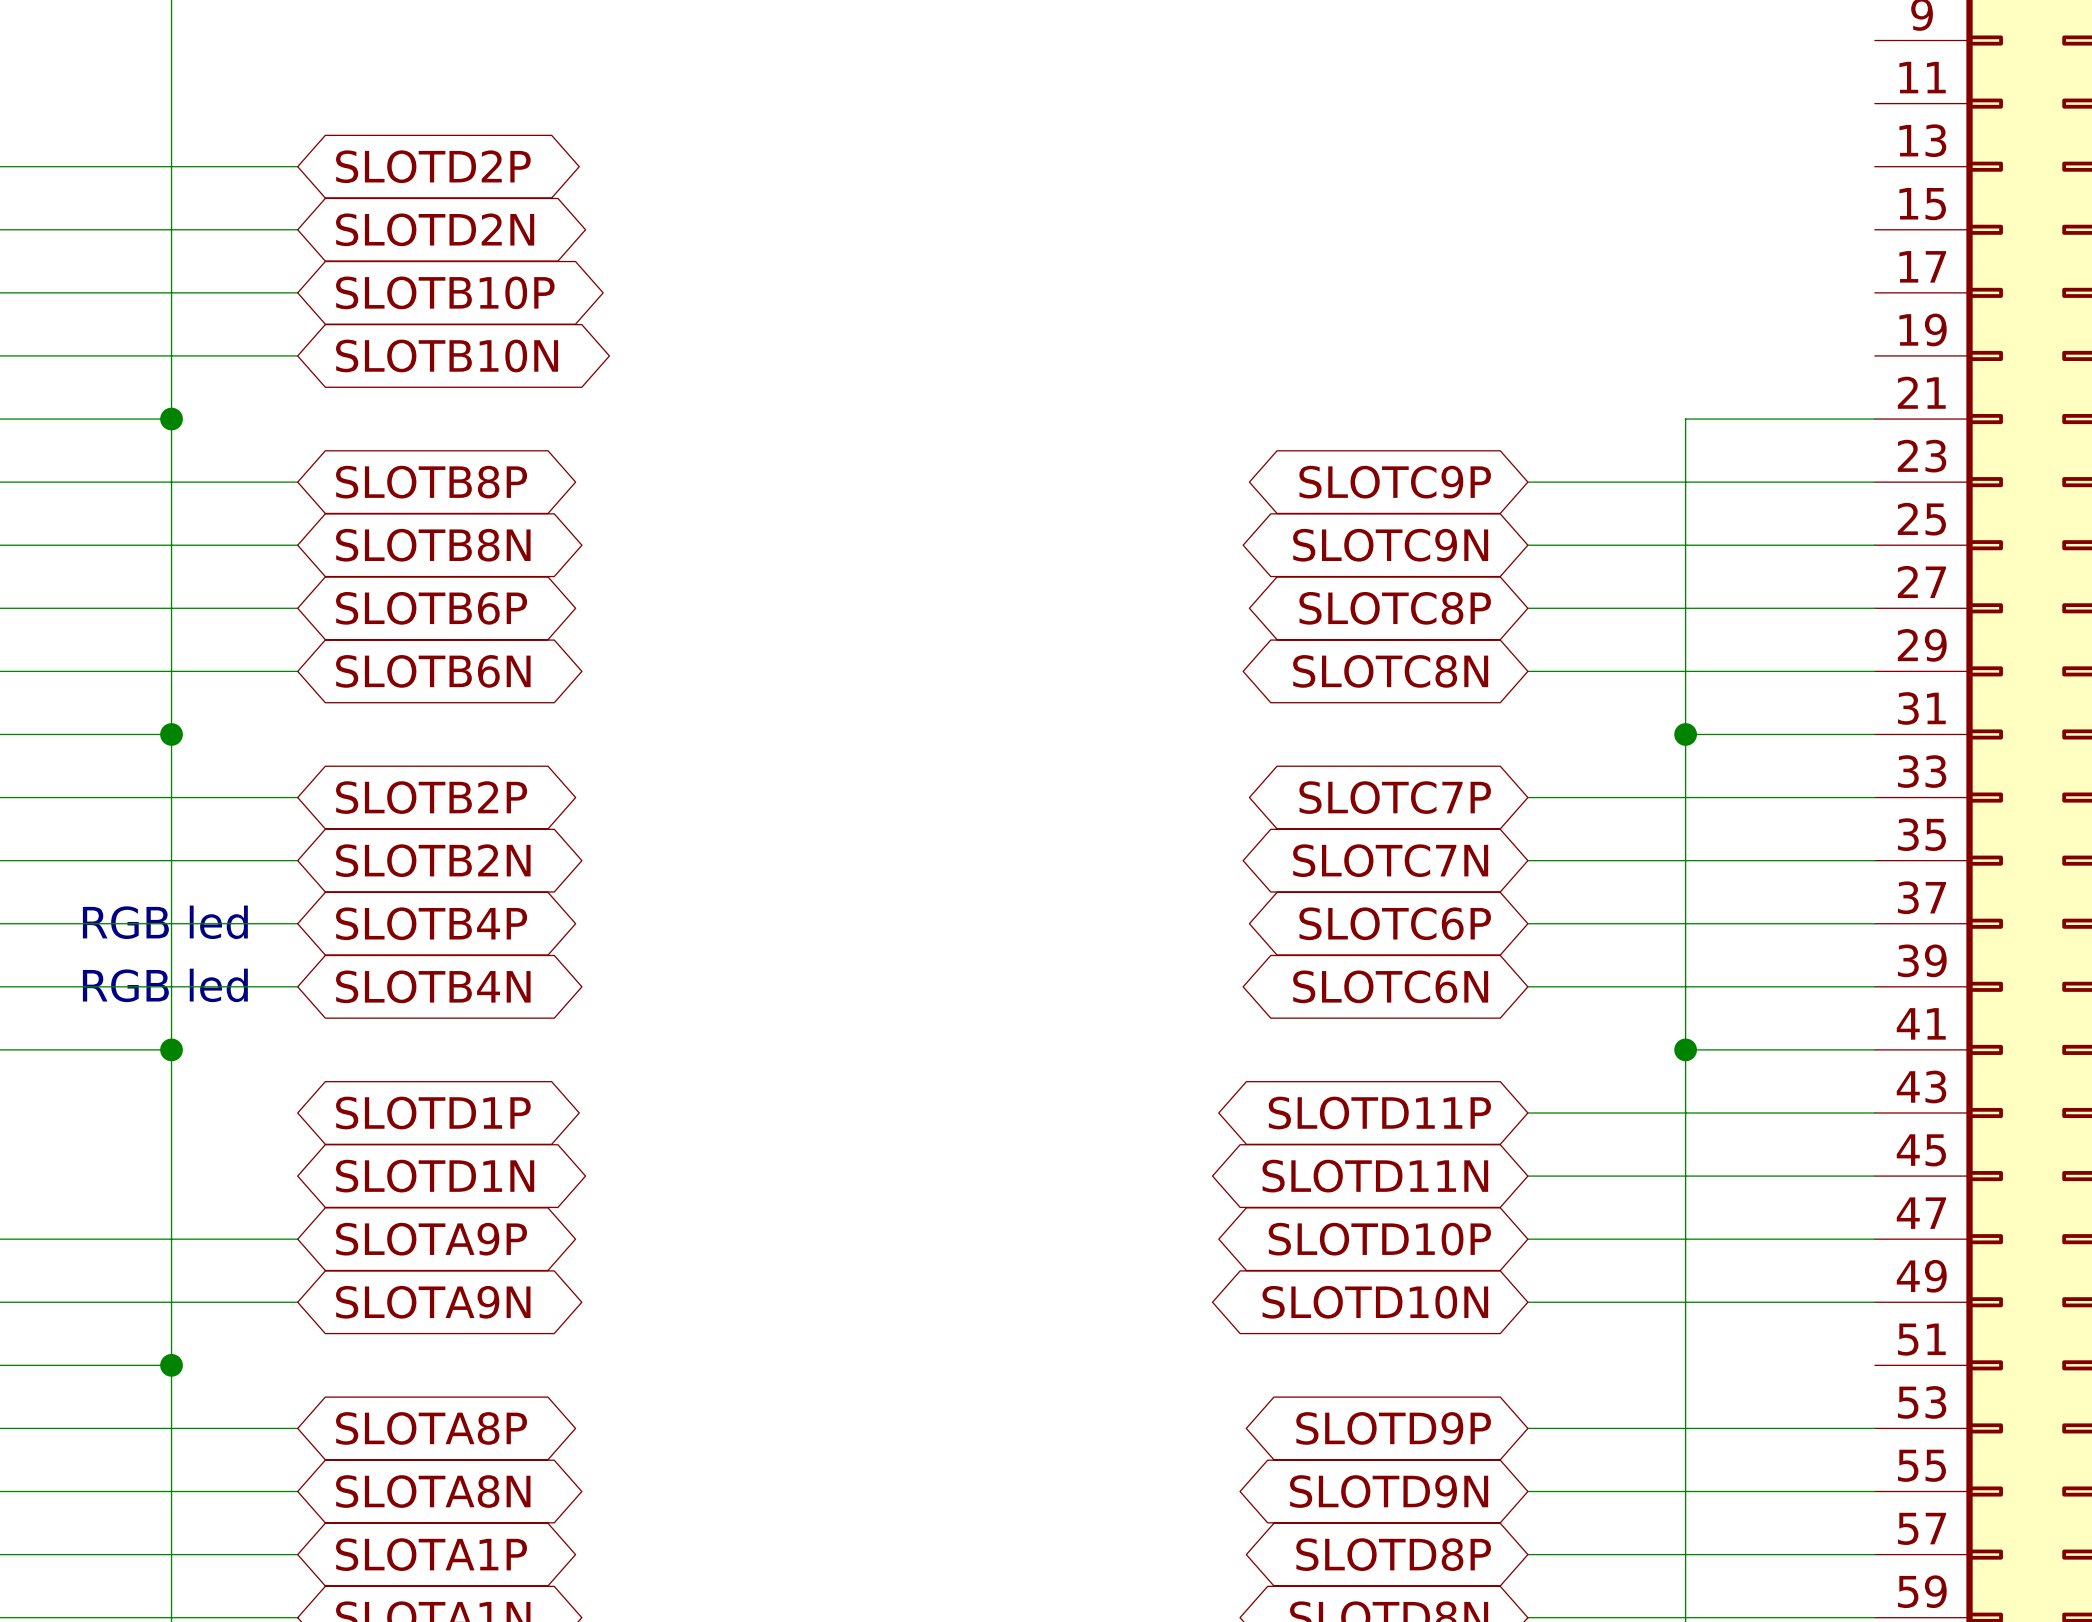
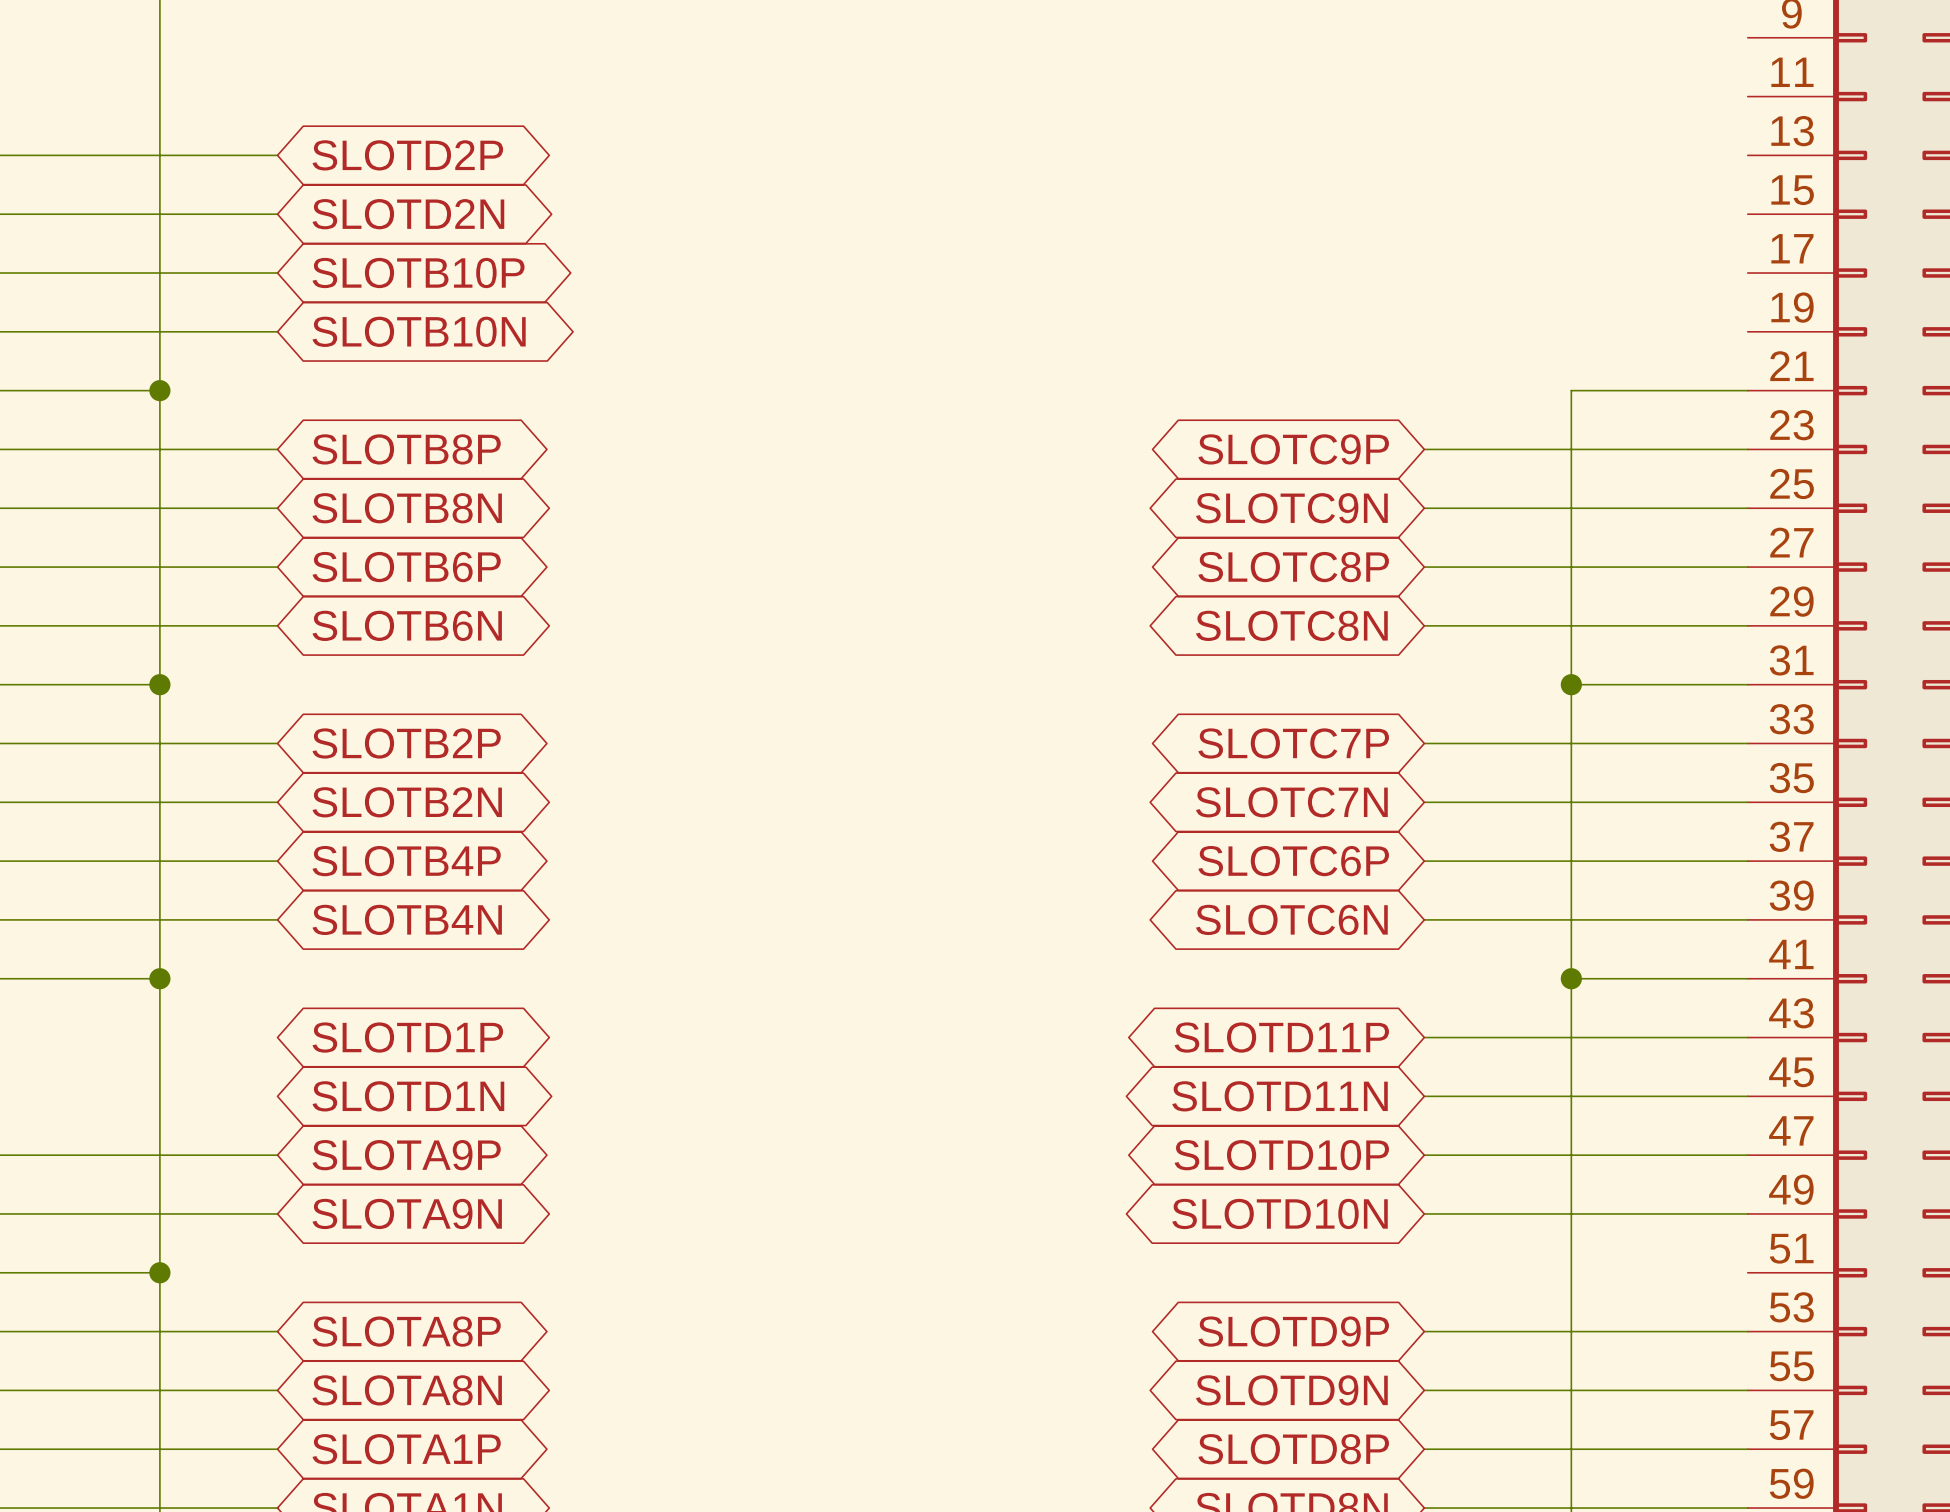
text: RGB led (165, 922) -> none
text: RGB led (165, 985) -> none

